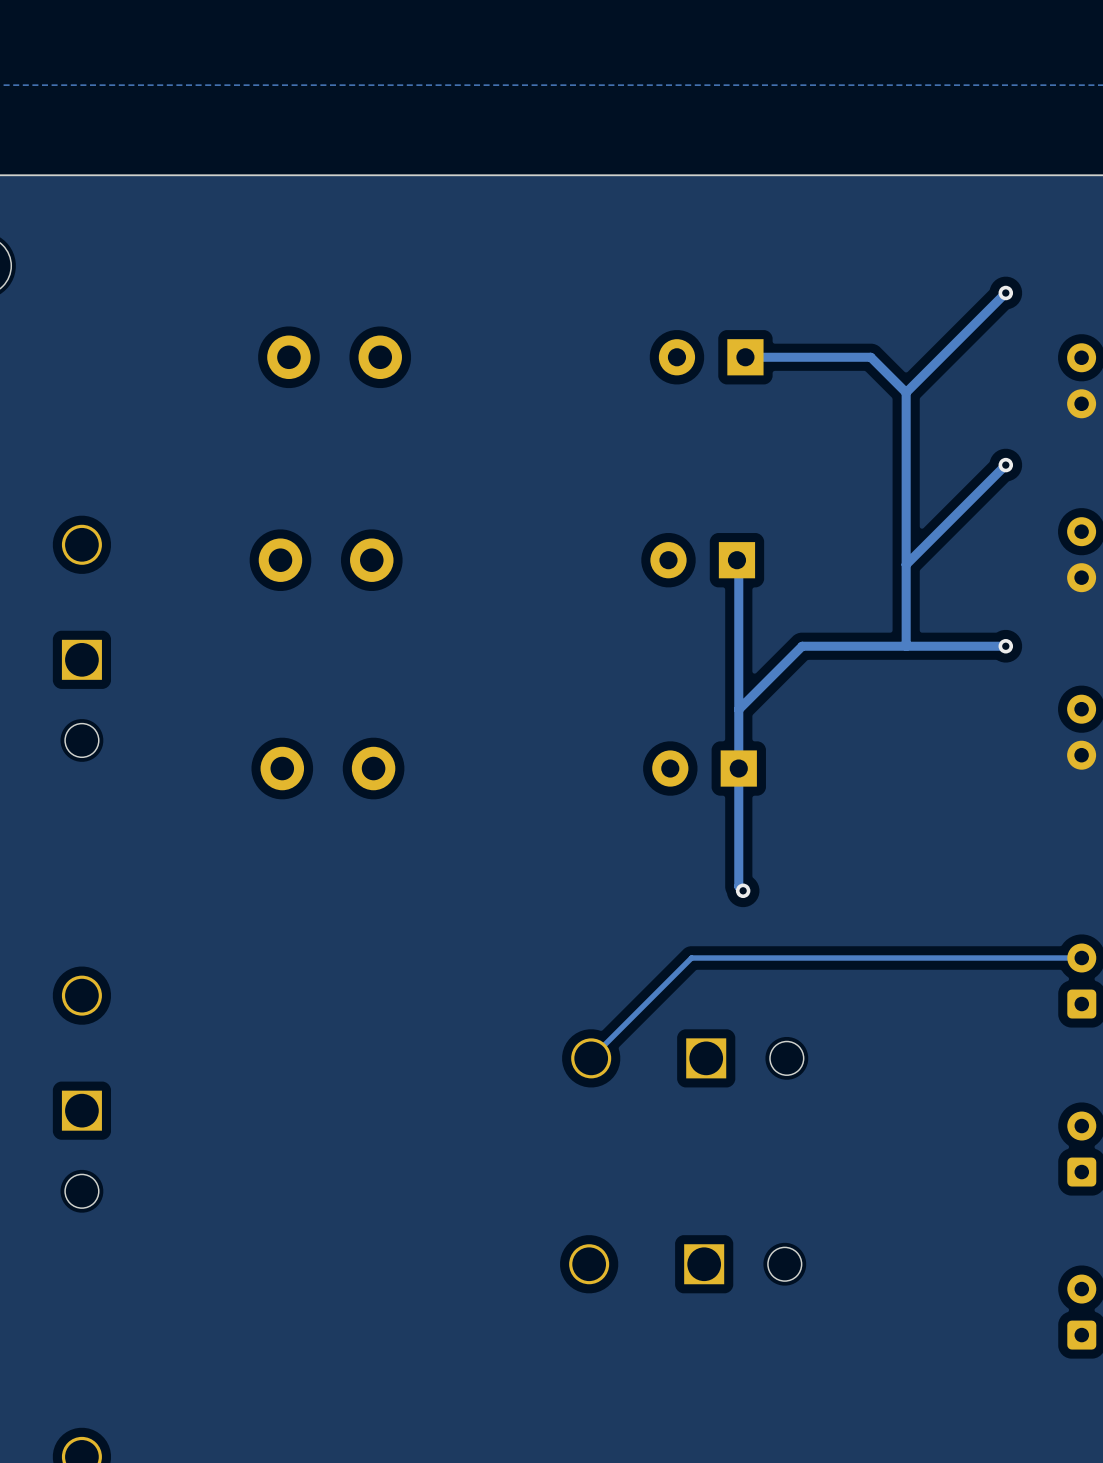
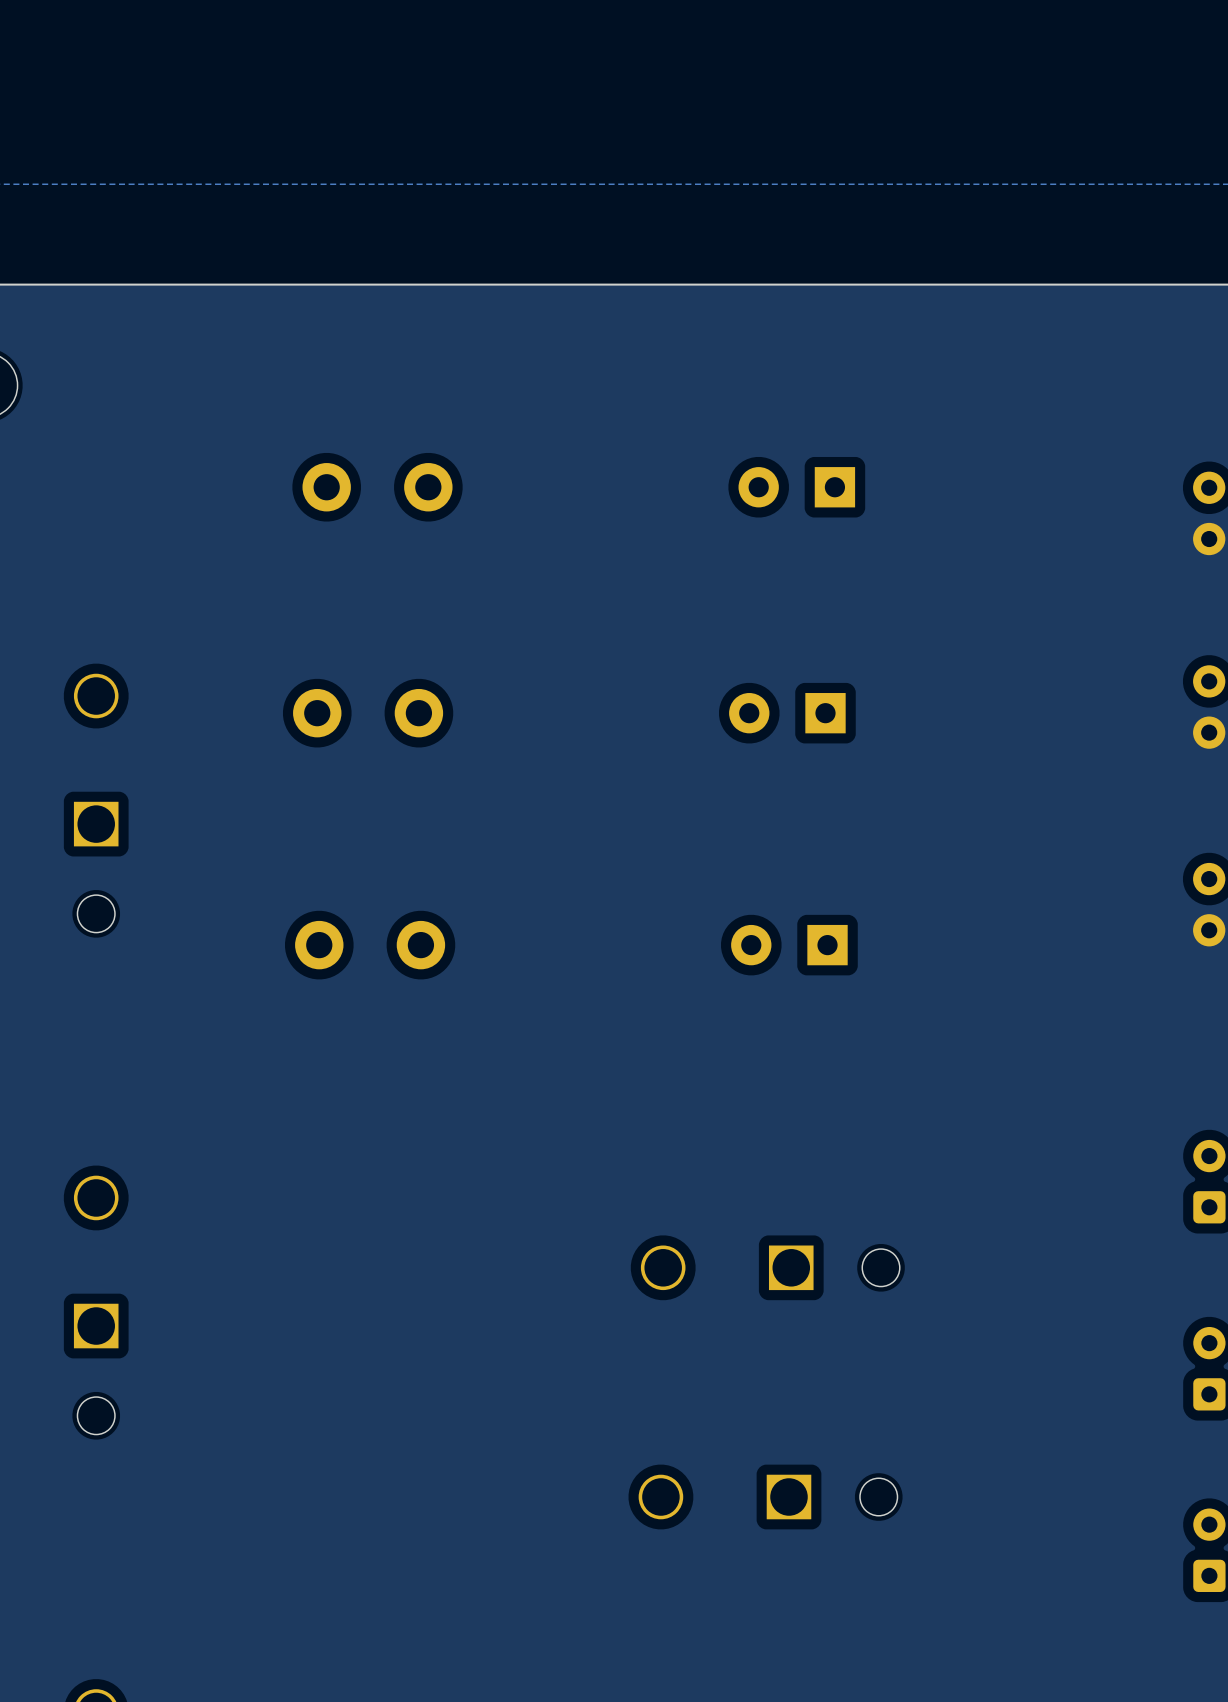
track: (1005, 293) (906, 392) -> none
via: (1005, 293) -> none
track: (745, 357) (870, 357) (906, 392) -> none
track: (906, 392) (906, 646) -> none
track: (1005, 465) (906, 564) -> none
via: (1005, 465) -> none
track: (736, 560) (738, 562) (738, 886) (743, 890) -> none
track: (1005, 646) (802, 646) (738, 709) -> none
via: (1005, 646) -> none
via: (743, 890) -> none
track: (1081, 958) (691, 958) (591, 1058) -> none

